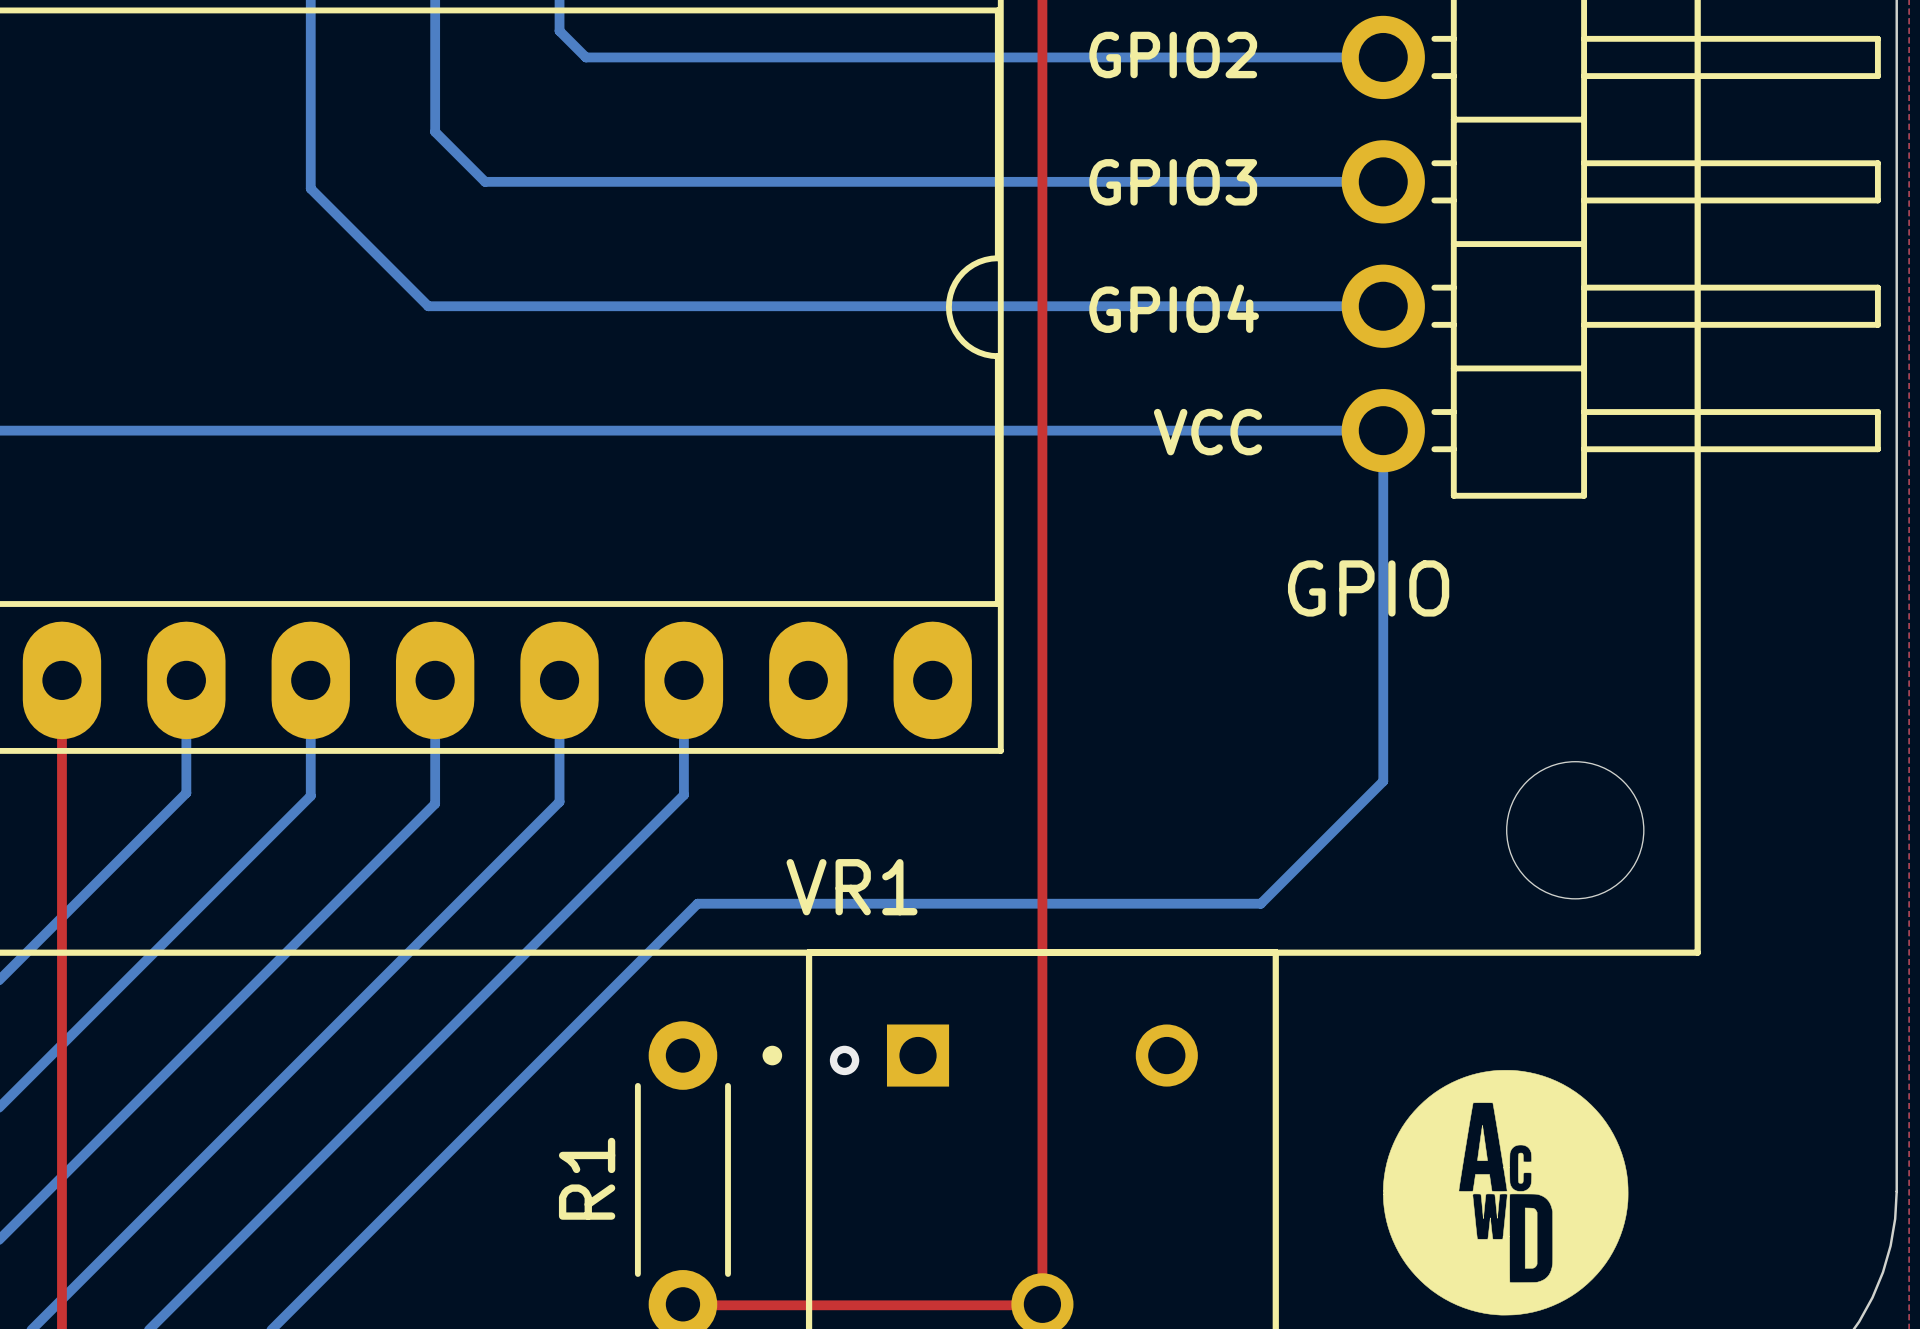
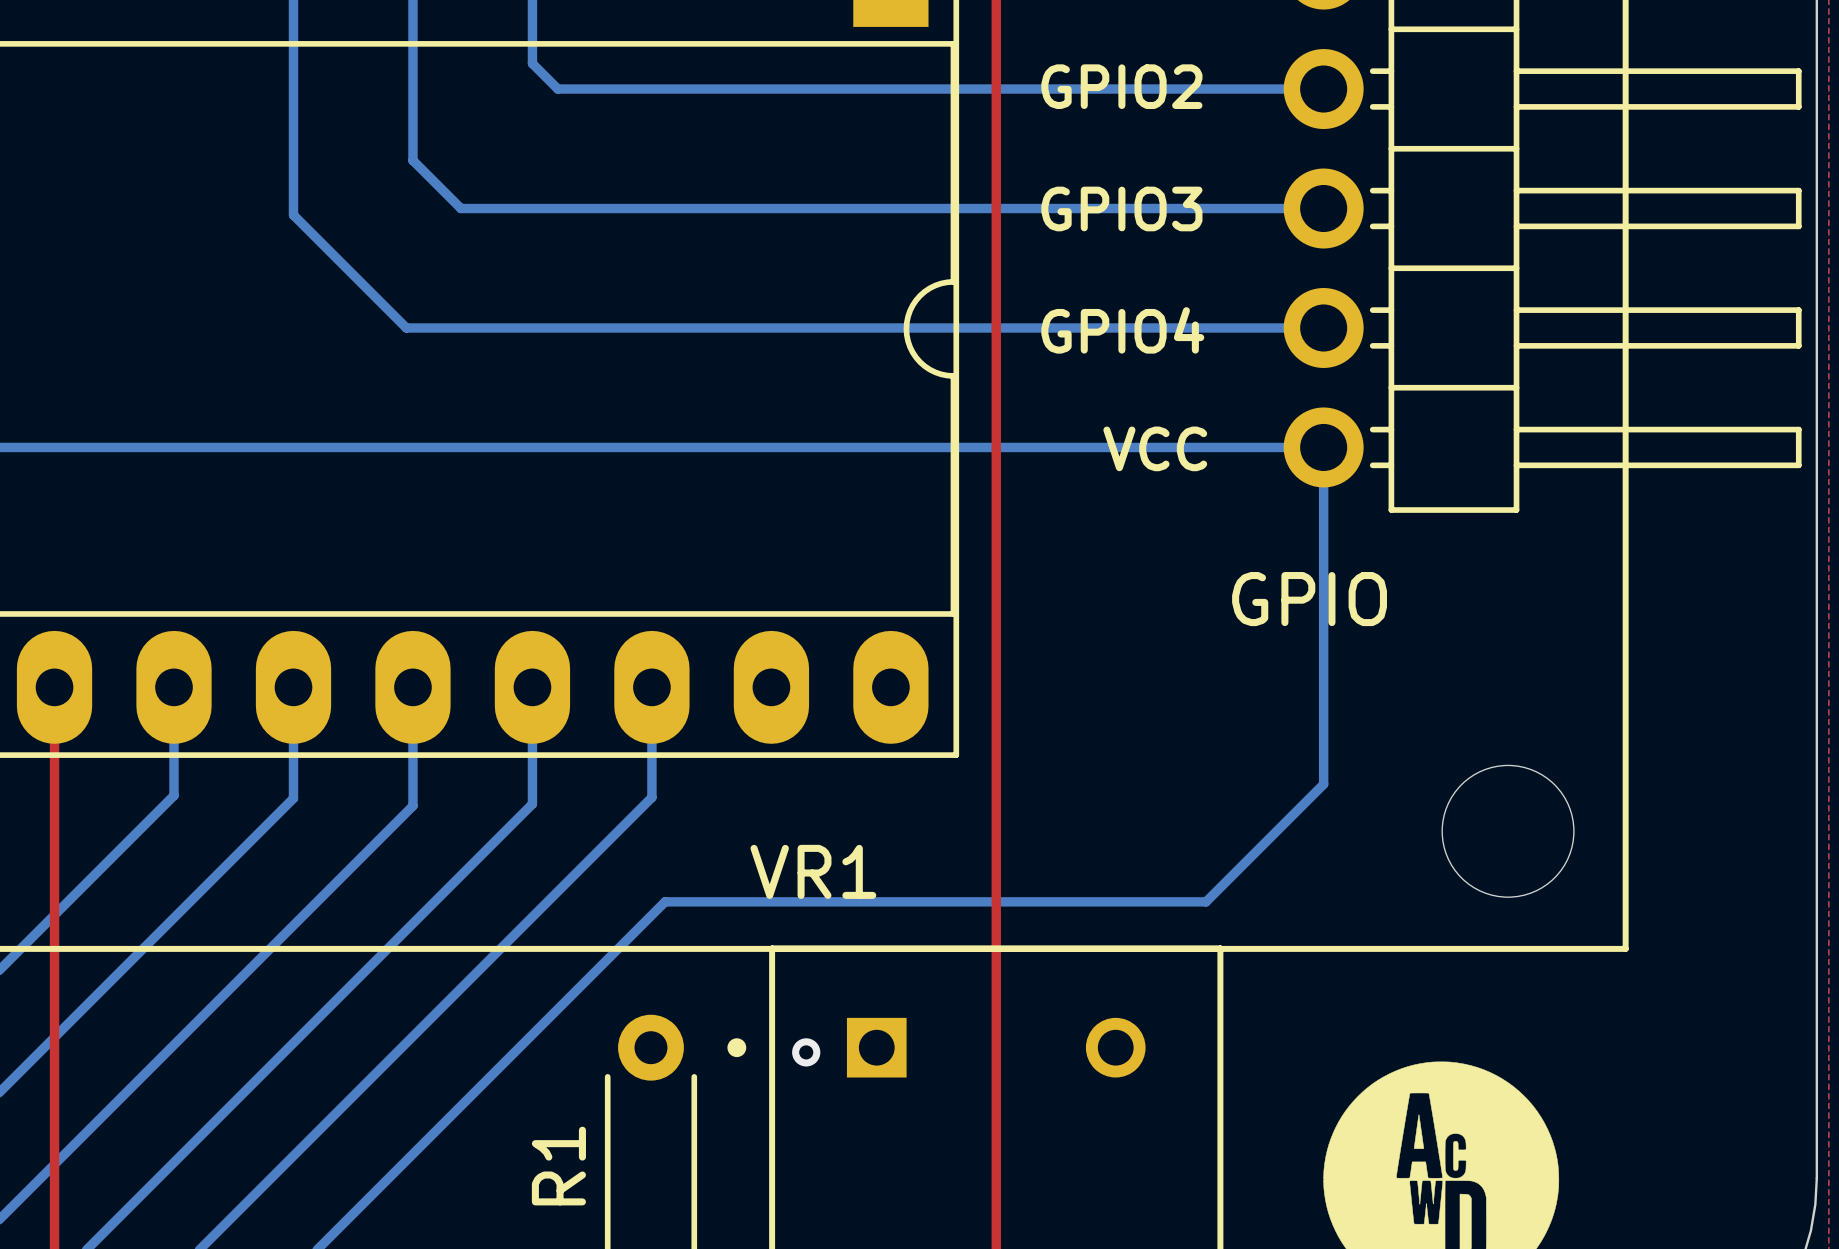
VR1 name position: VR1 (852, 887) -> VR1 (813, 871)

